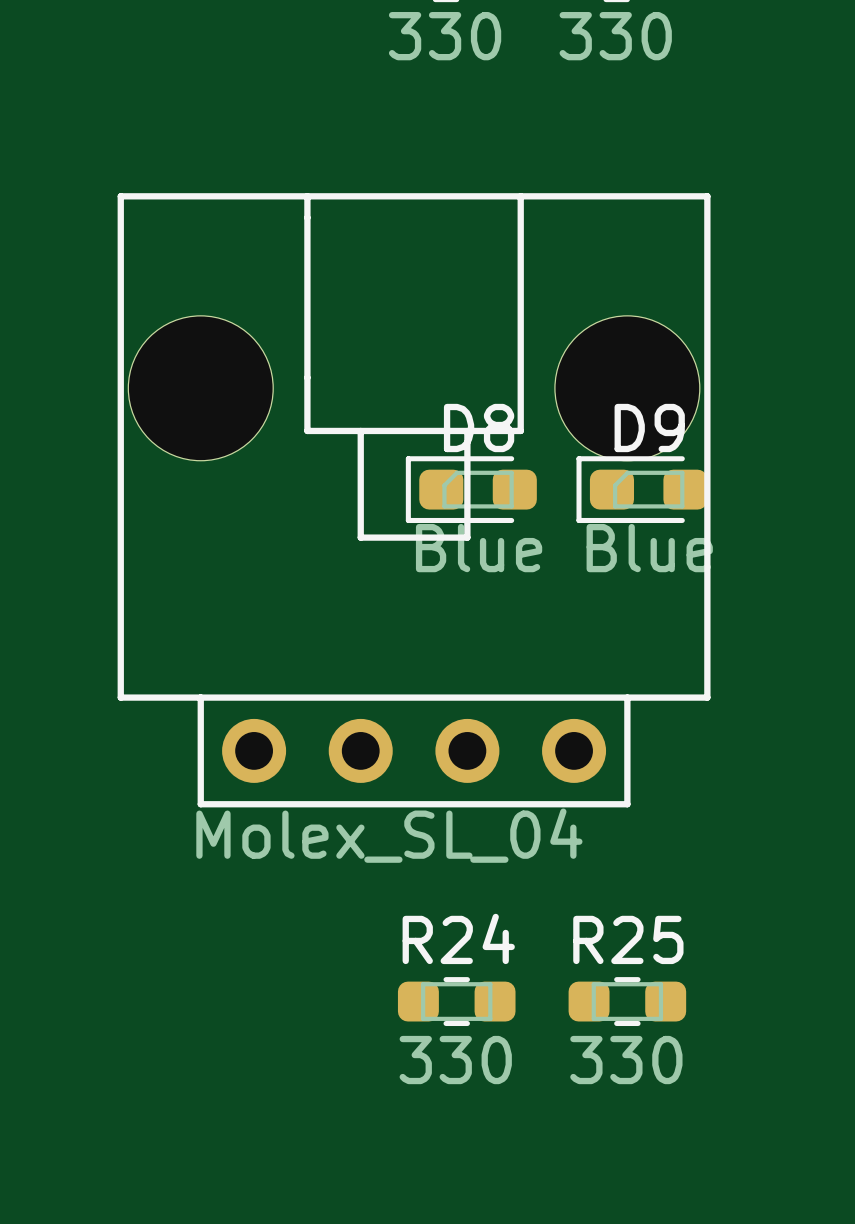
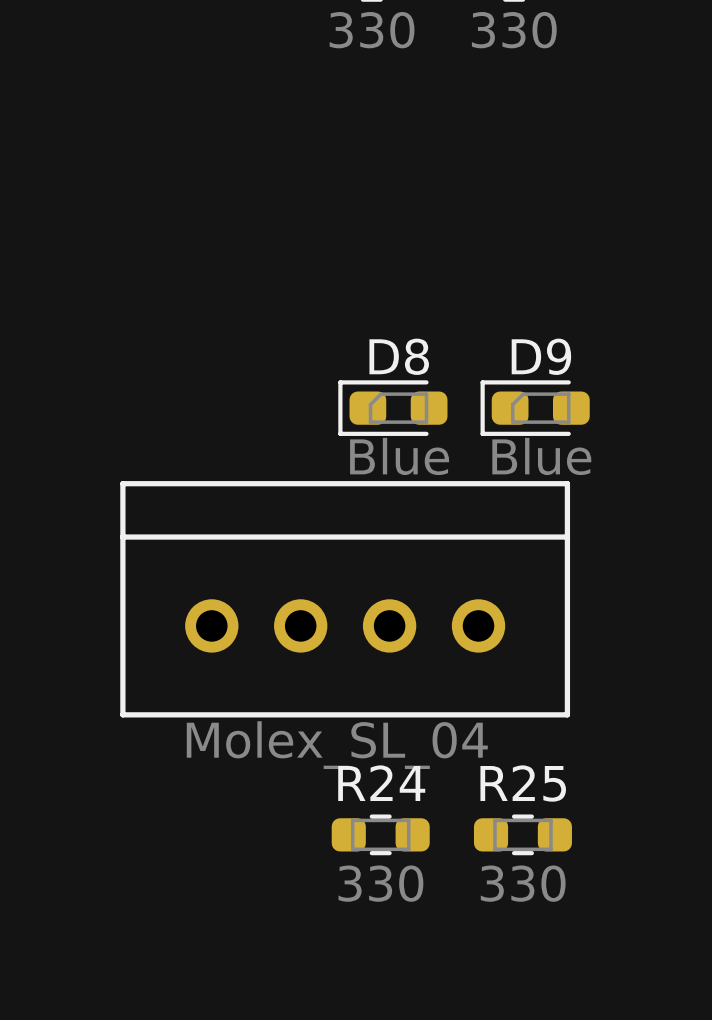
part: Molex_SL_04 (414, 500) -> none
part: none -> Molex_SL_04 (345, 599)

